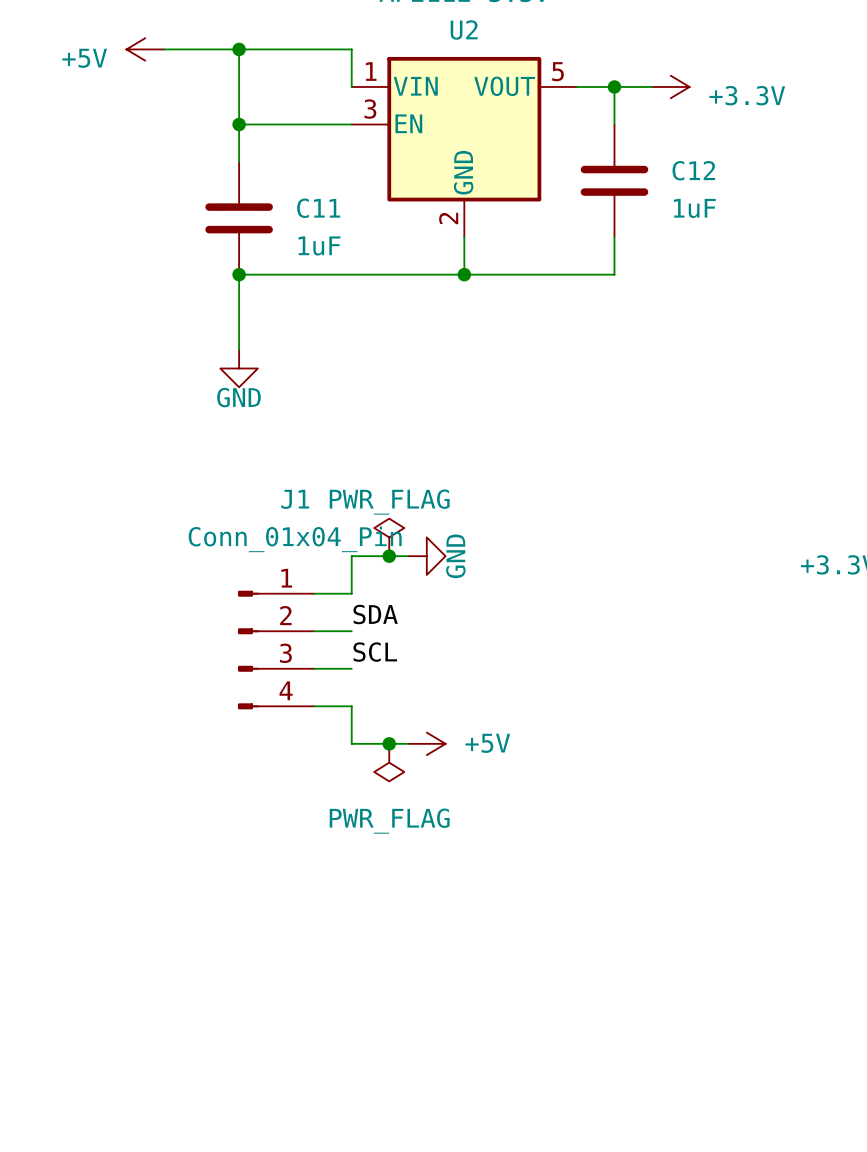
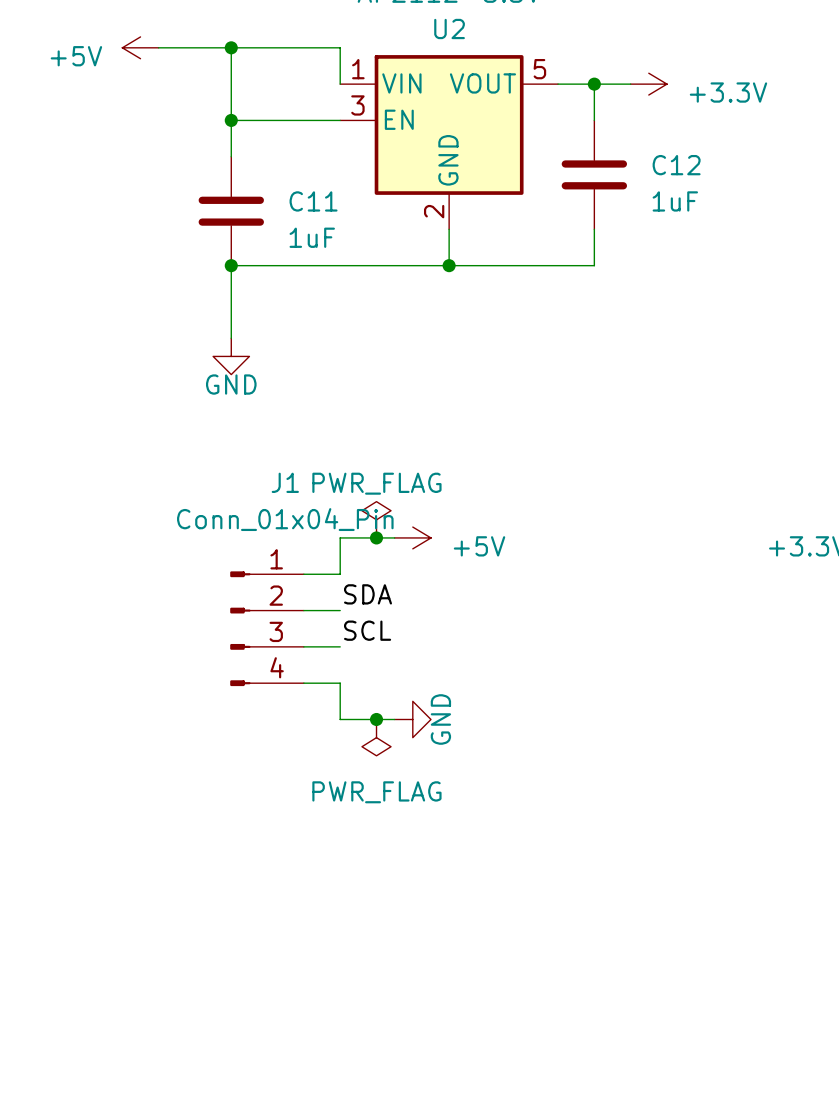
power symbol: GND (426, 556) -> +5V (412, 537)
power symbol: +5V (426, 743) -> GND (412, 719)

